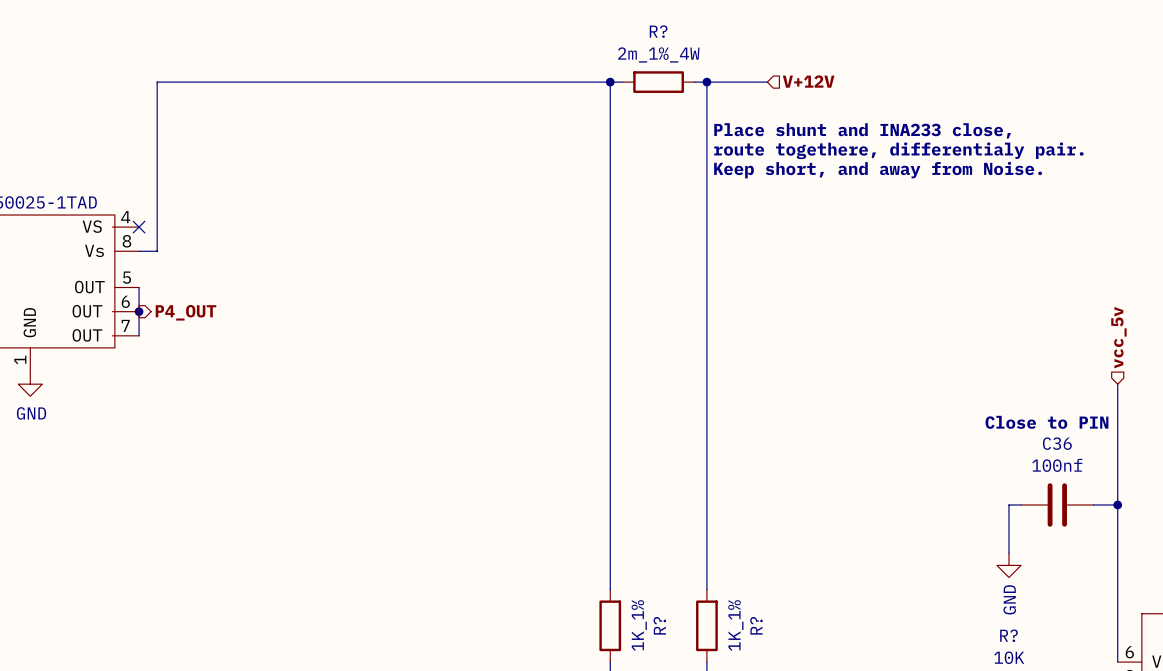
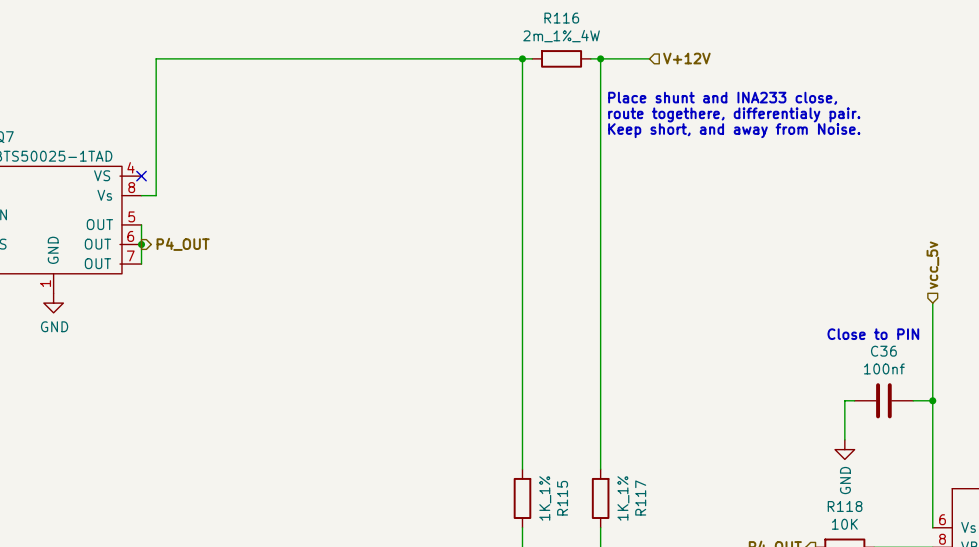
R? name: R? (658, 31) -> R116 (561, 18)
R? name: R? (659, 625) -> R115 (562, 498)
R? name: R? (756, 625) -> R117 (640, 498)
R? name: R? (1008, 635) -> R118 (845, 506)

